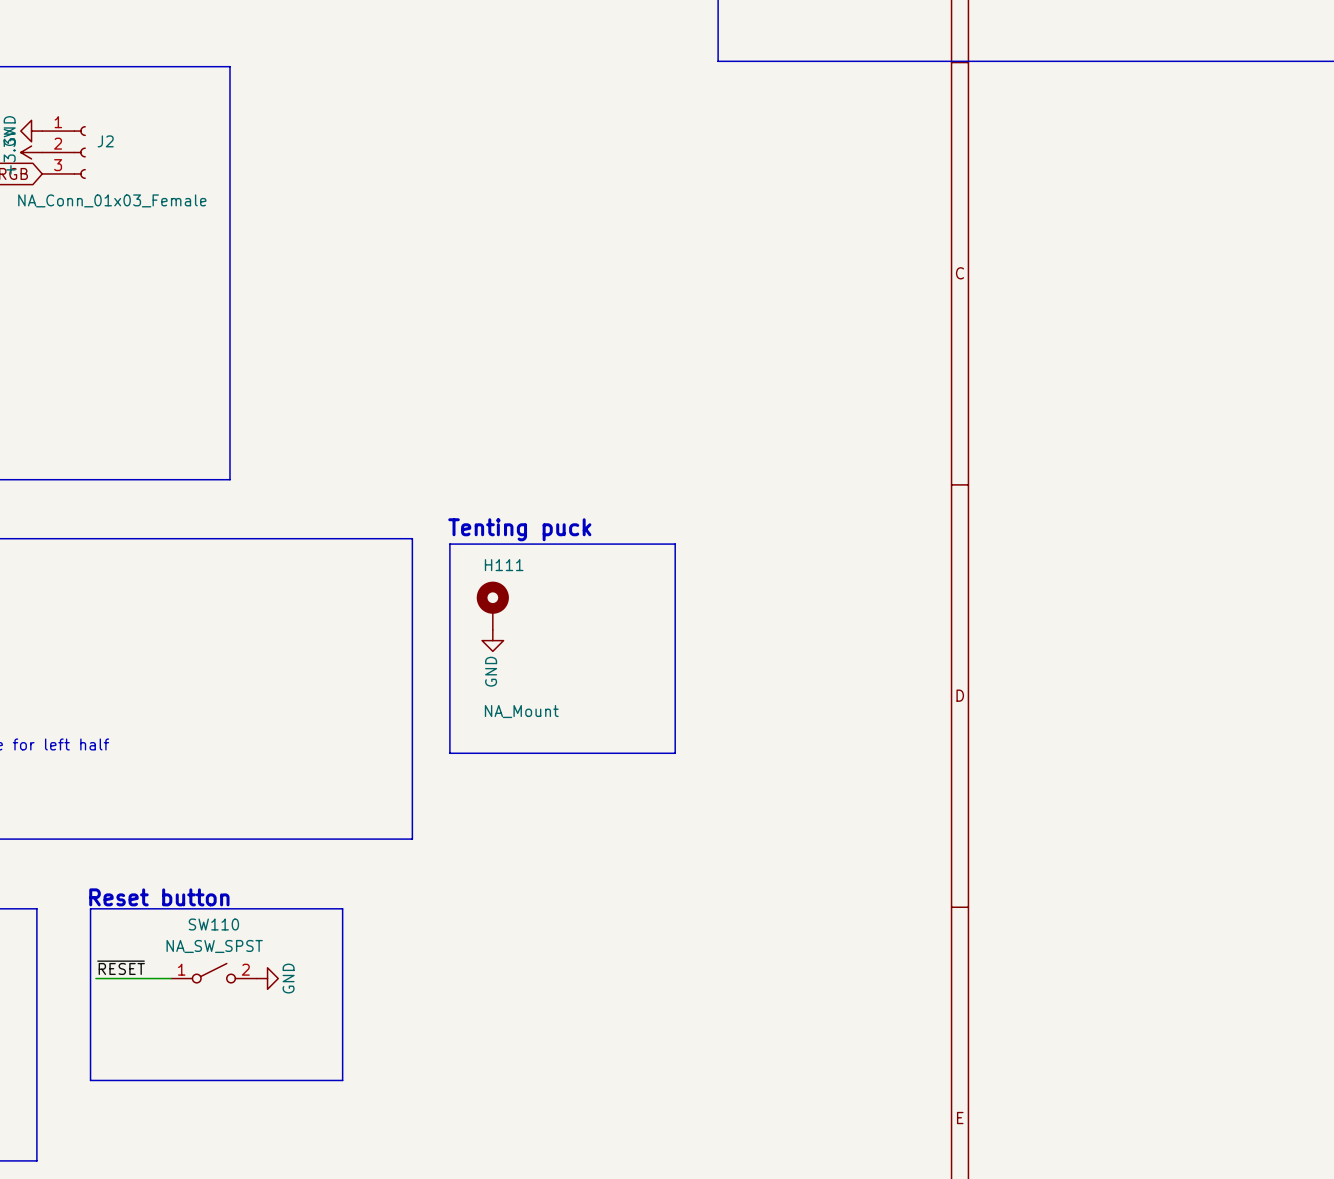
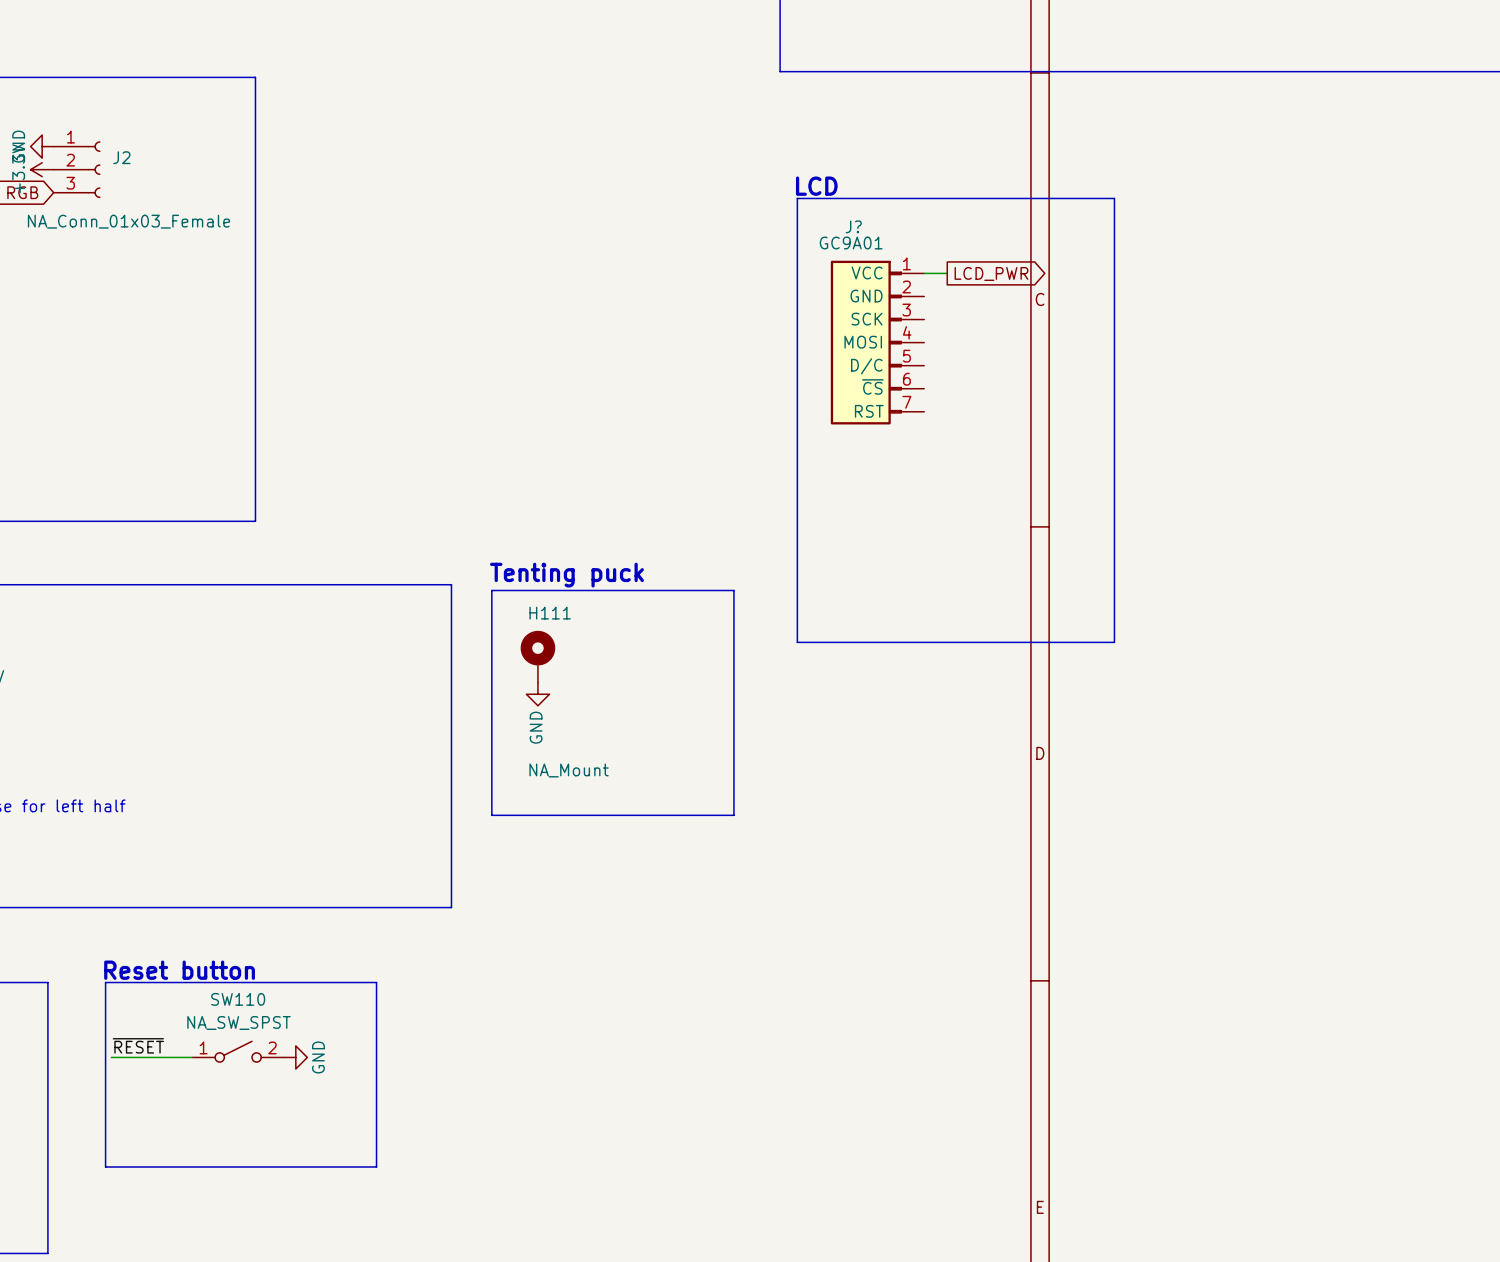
text: none -> LCD (816, 186)
line: none -> (797, 198) (797, 642) (1114, 642) (1114, 198) (797, 198)
wire: none -> (924, 273) (947, 273)
global label: none -> LCD_PWR (991, 273)
J?: none -> GC9A01 (877, 342)

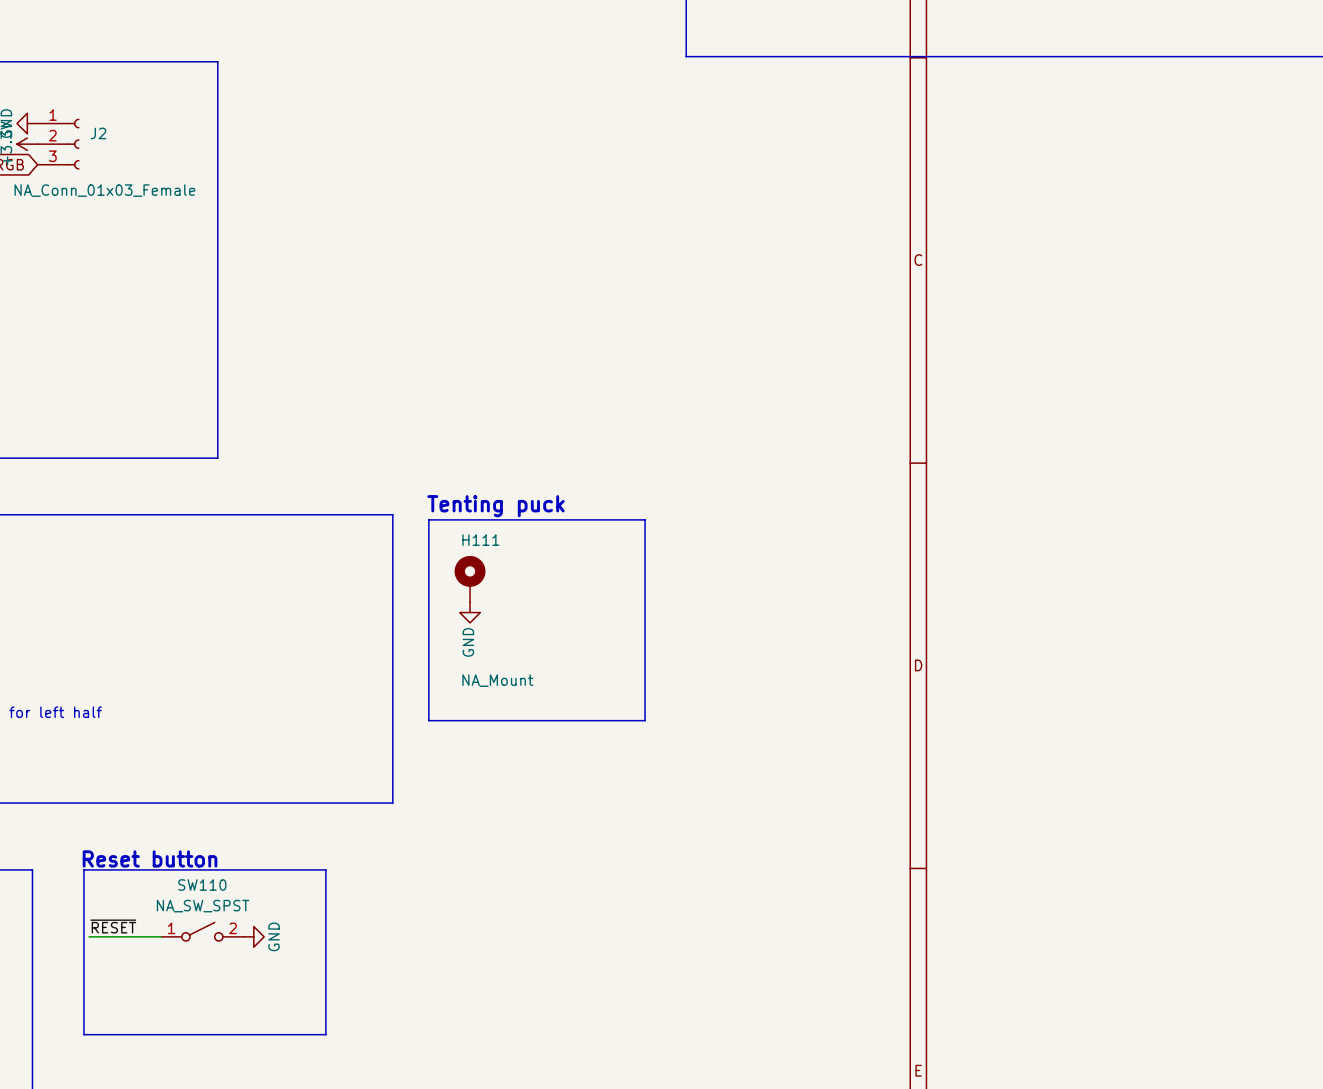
text: LCD (816, 186) -> none
line: (797, 198) (797, 642) (1114, 642) (1114, 198) (797, 198) -> none
wire: (924, 273) (947, 273) -> none
global label: LCD_PWR (991, 273) -> none
J?: GC9A01 (877, 342) -> none

